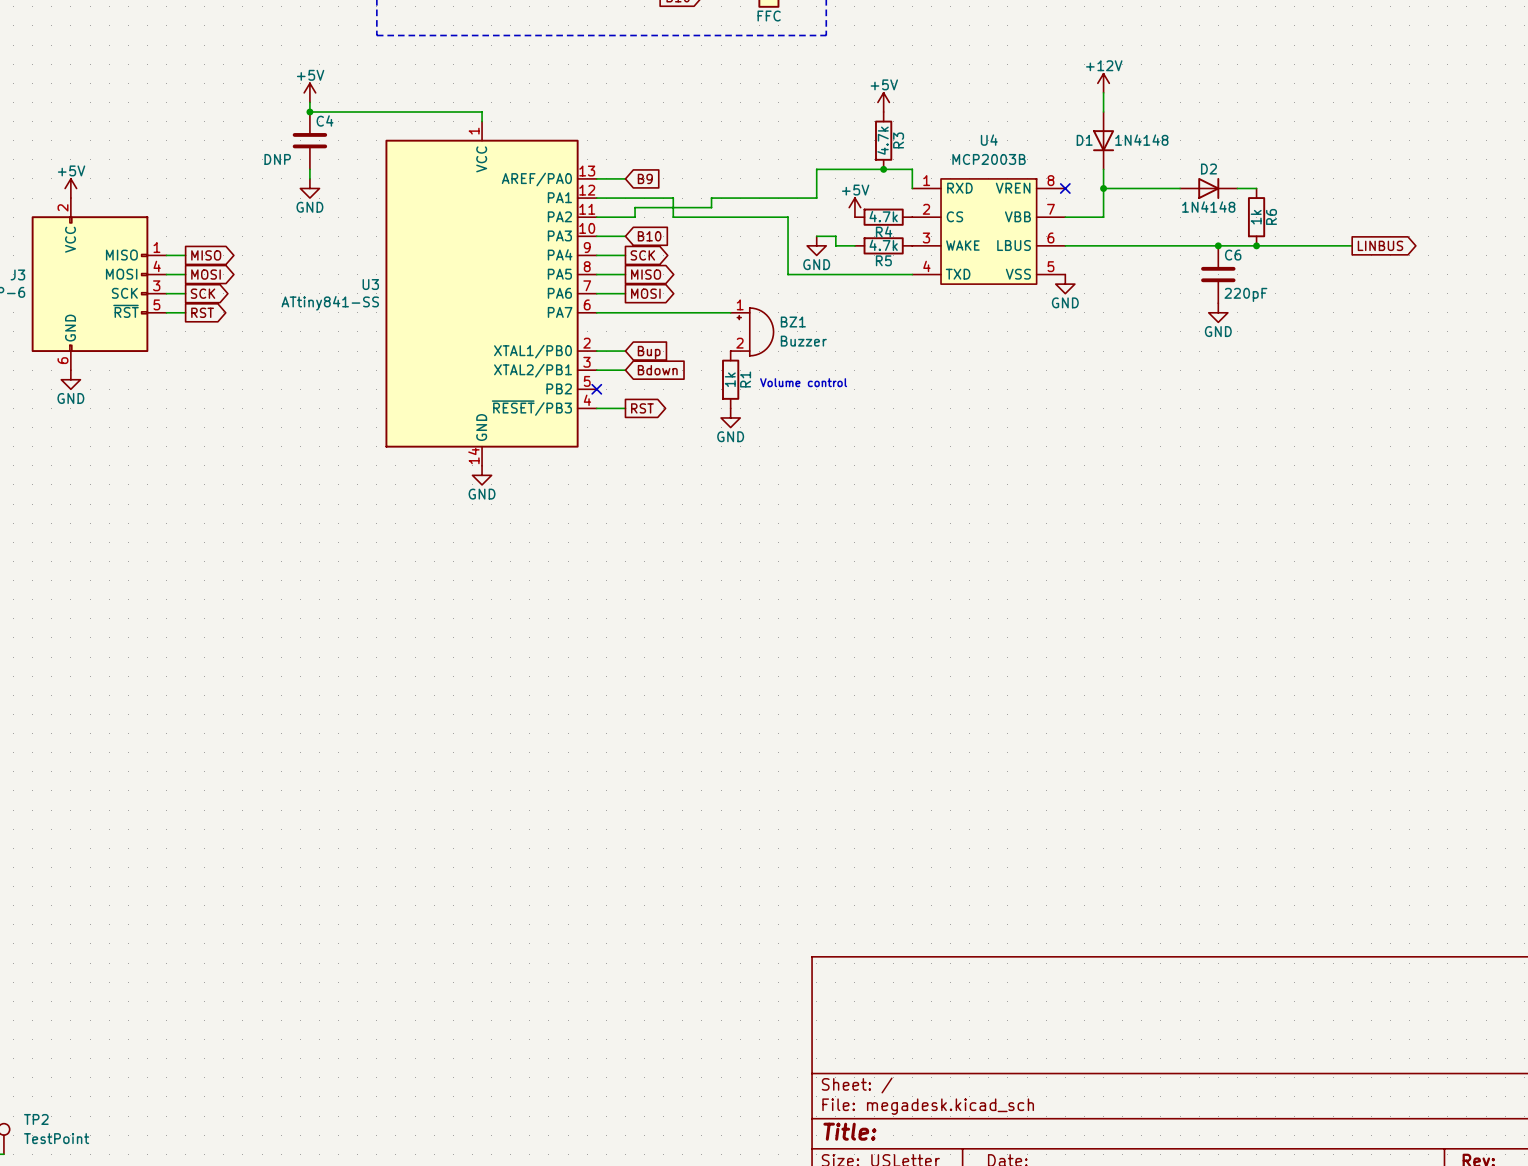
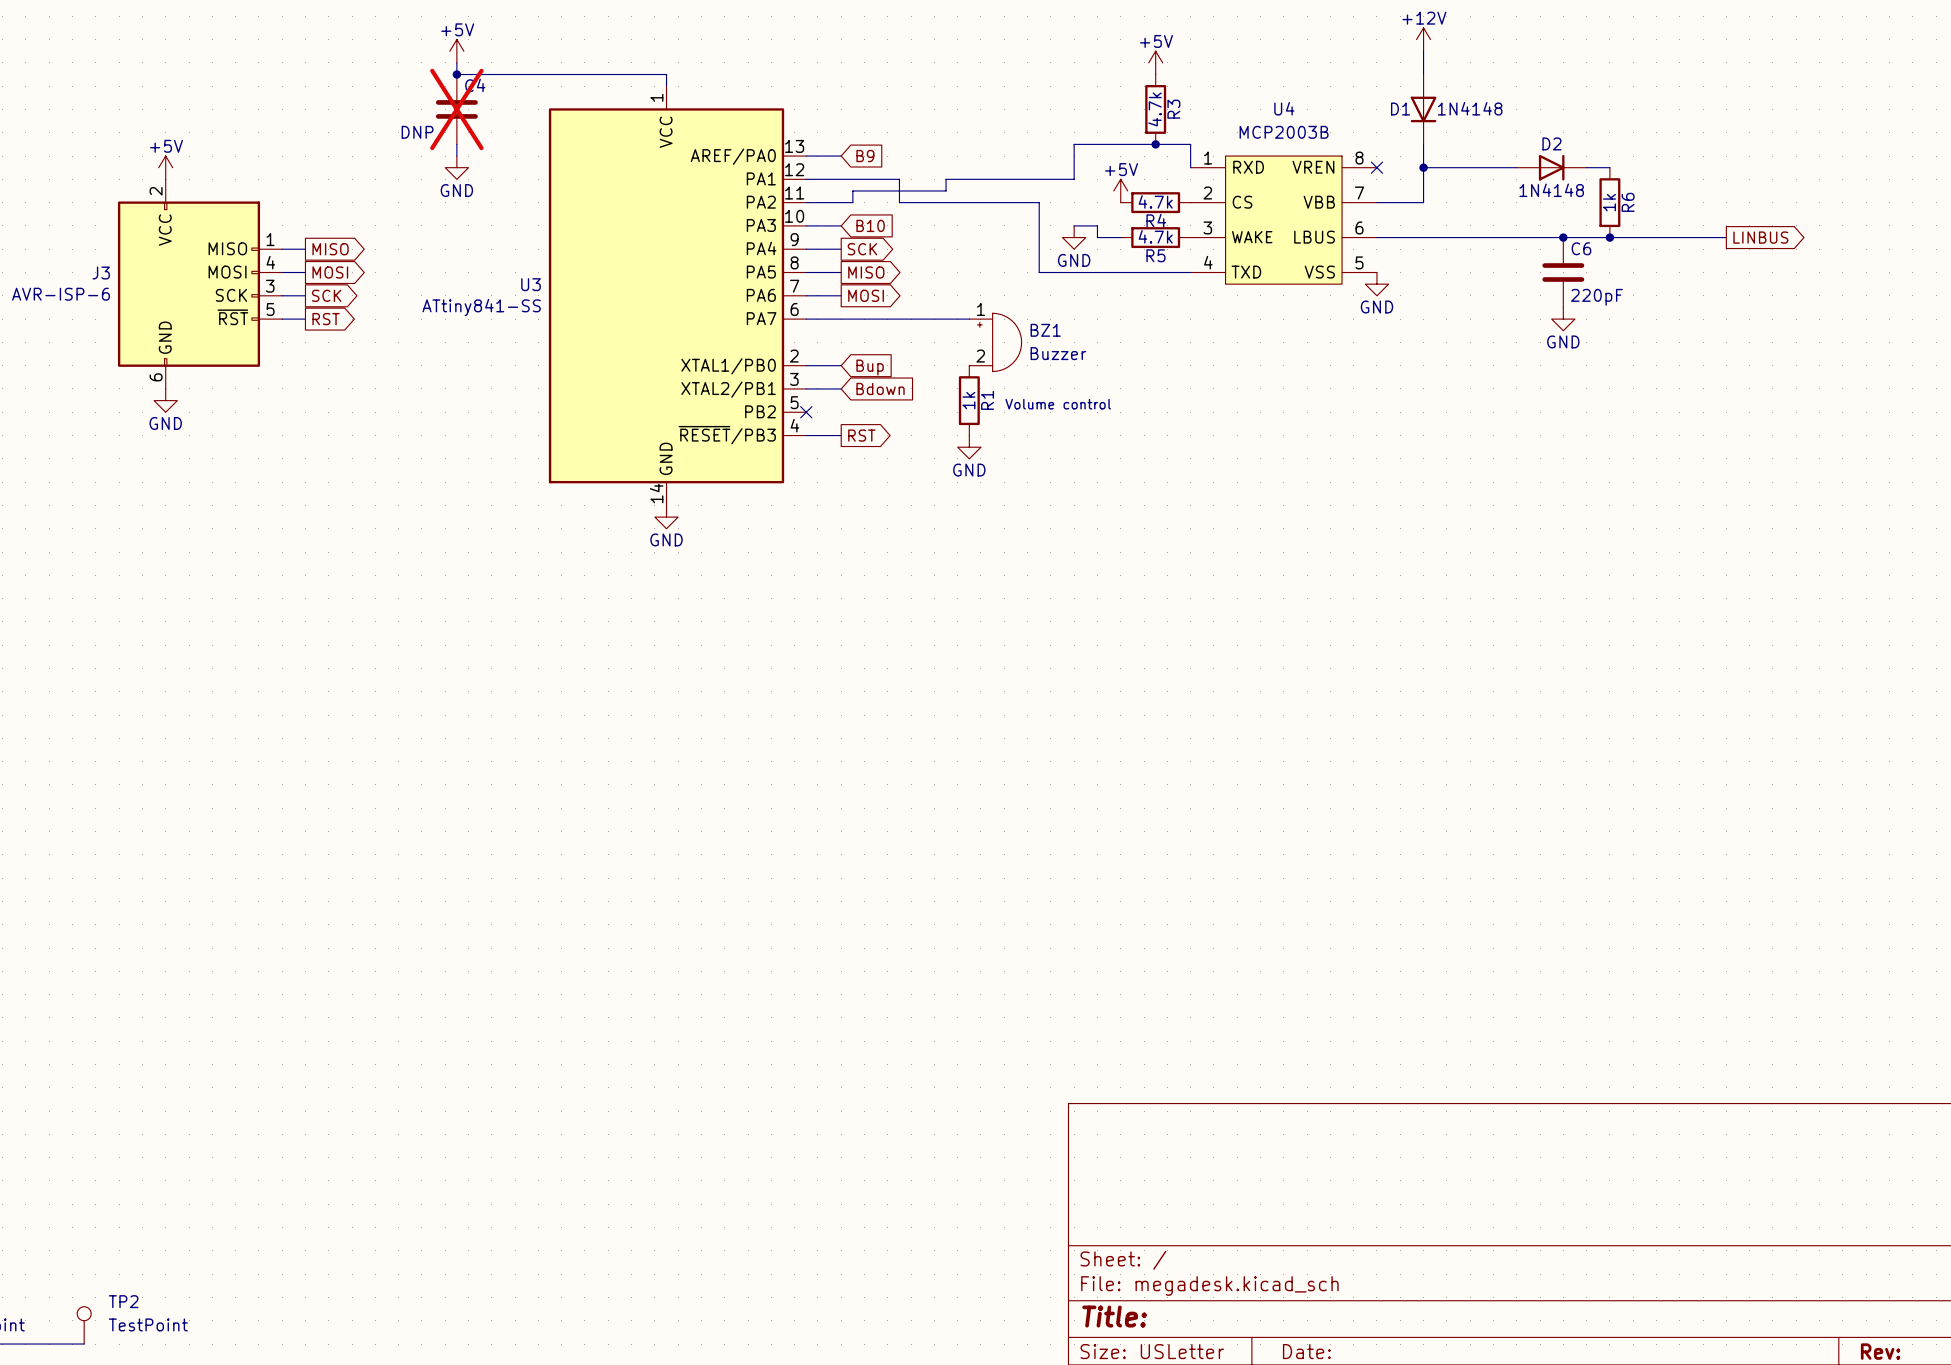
C4 do-not-place cross: none -> (456, 109)

